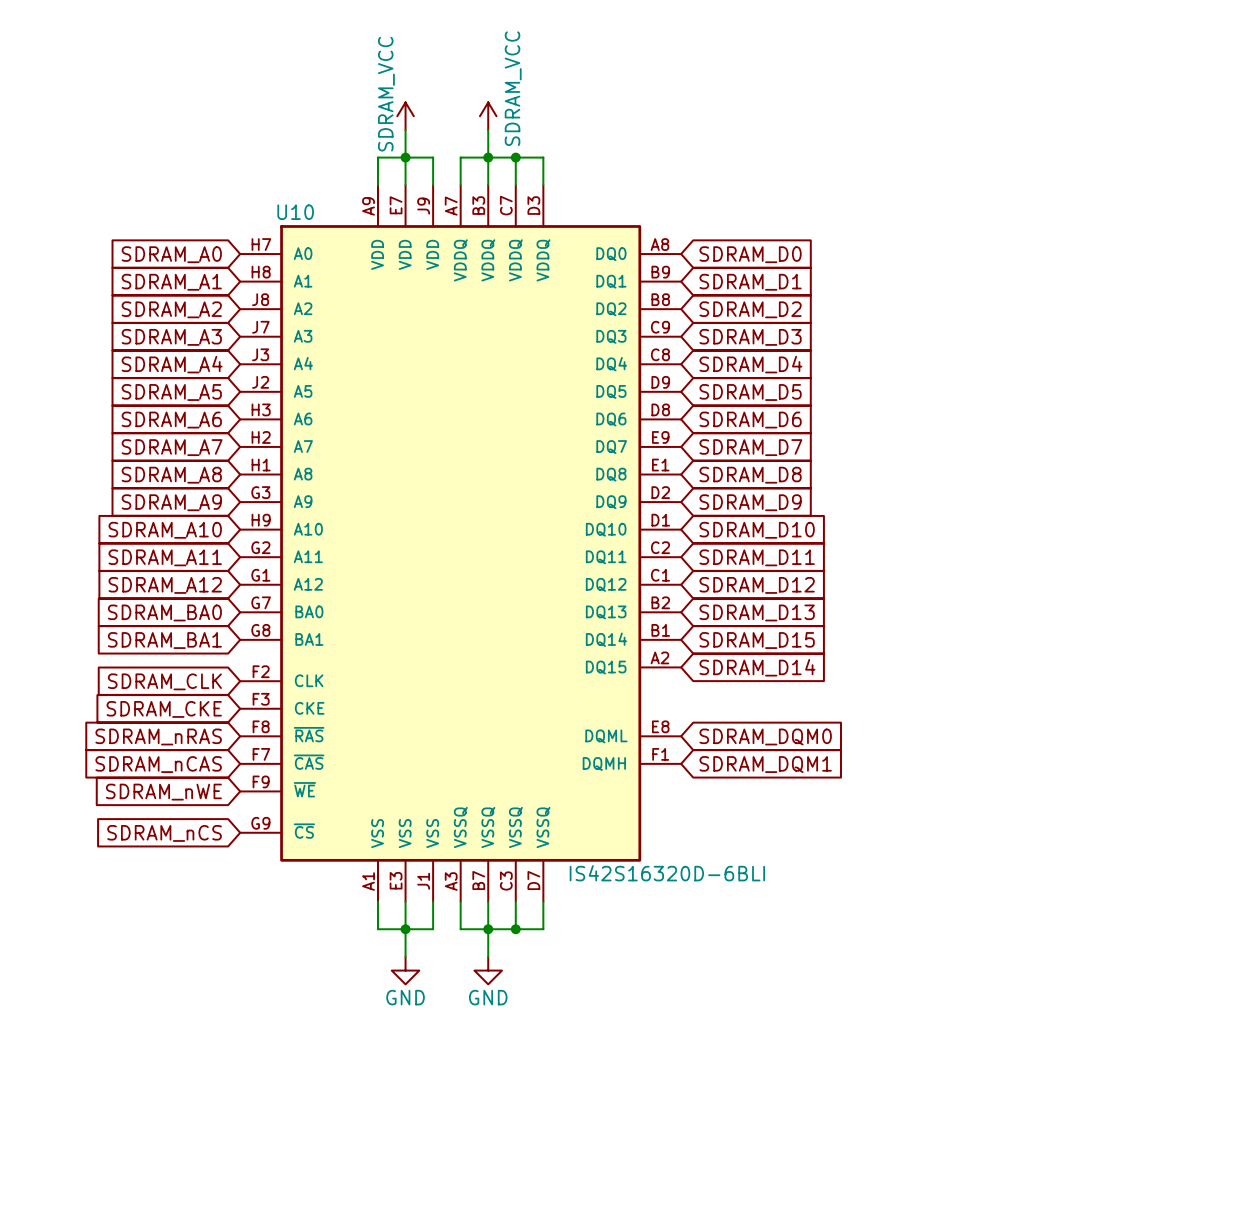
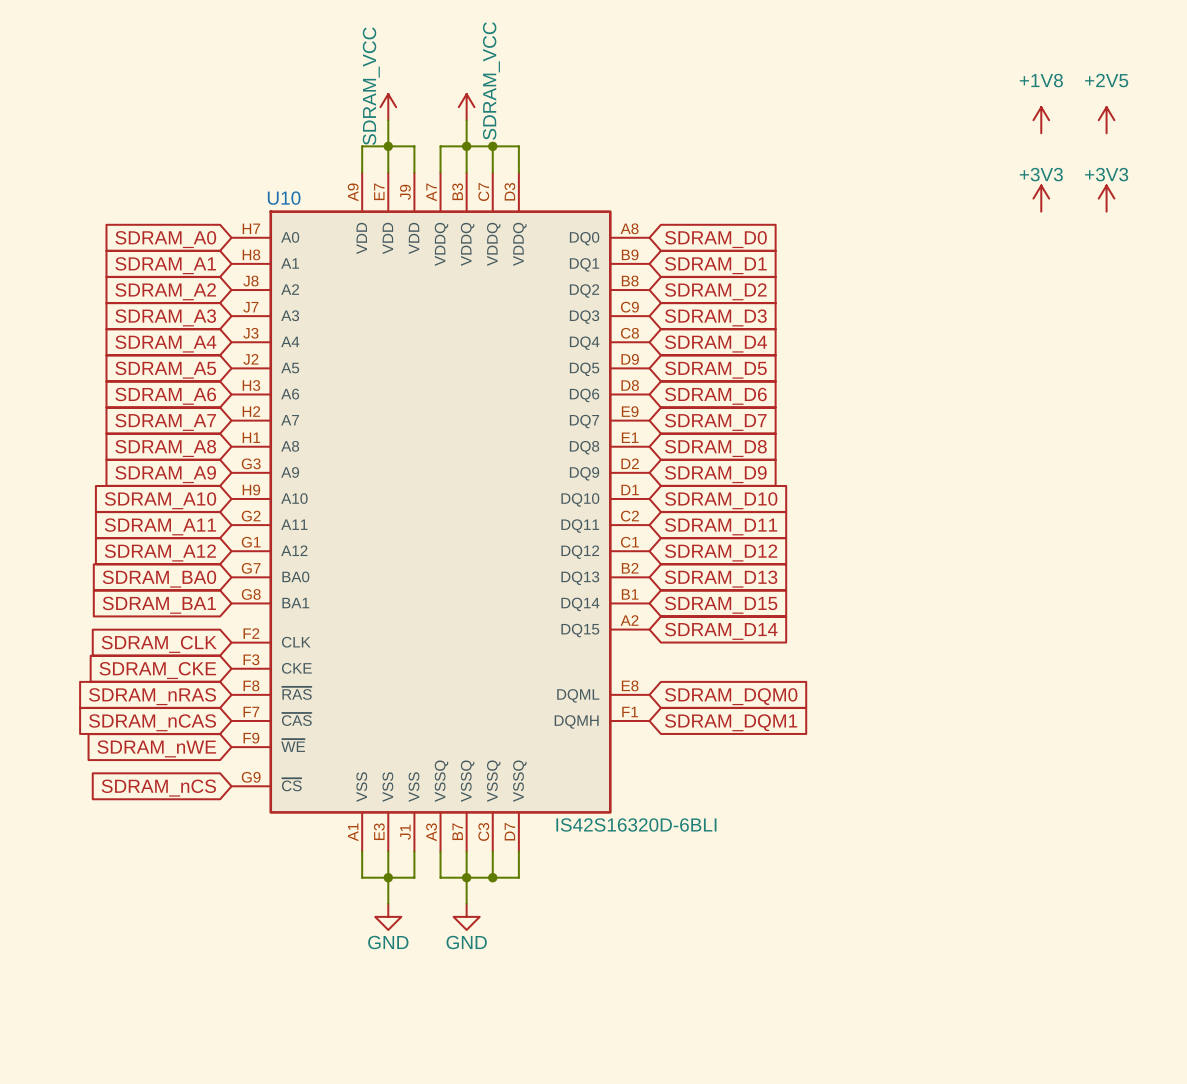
power symbol: none -> +1V8 (1041, 120)
power symbol: none -> +2V5 (1106, 120)
power symbol: none -> +3V3 (1041, 198)
power symbol: none -> +3V3 (1106, 198)

